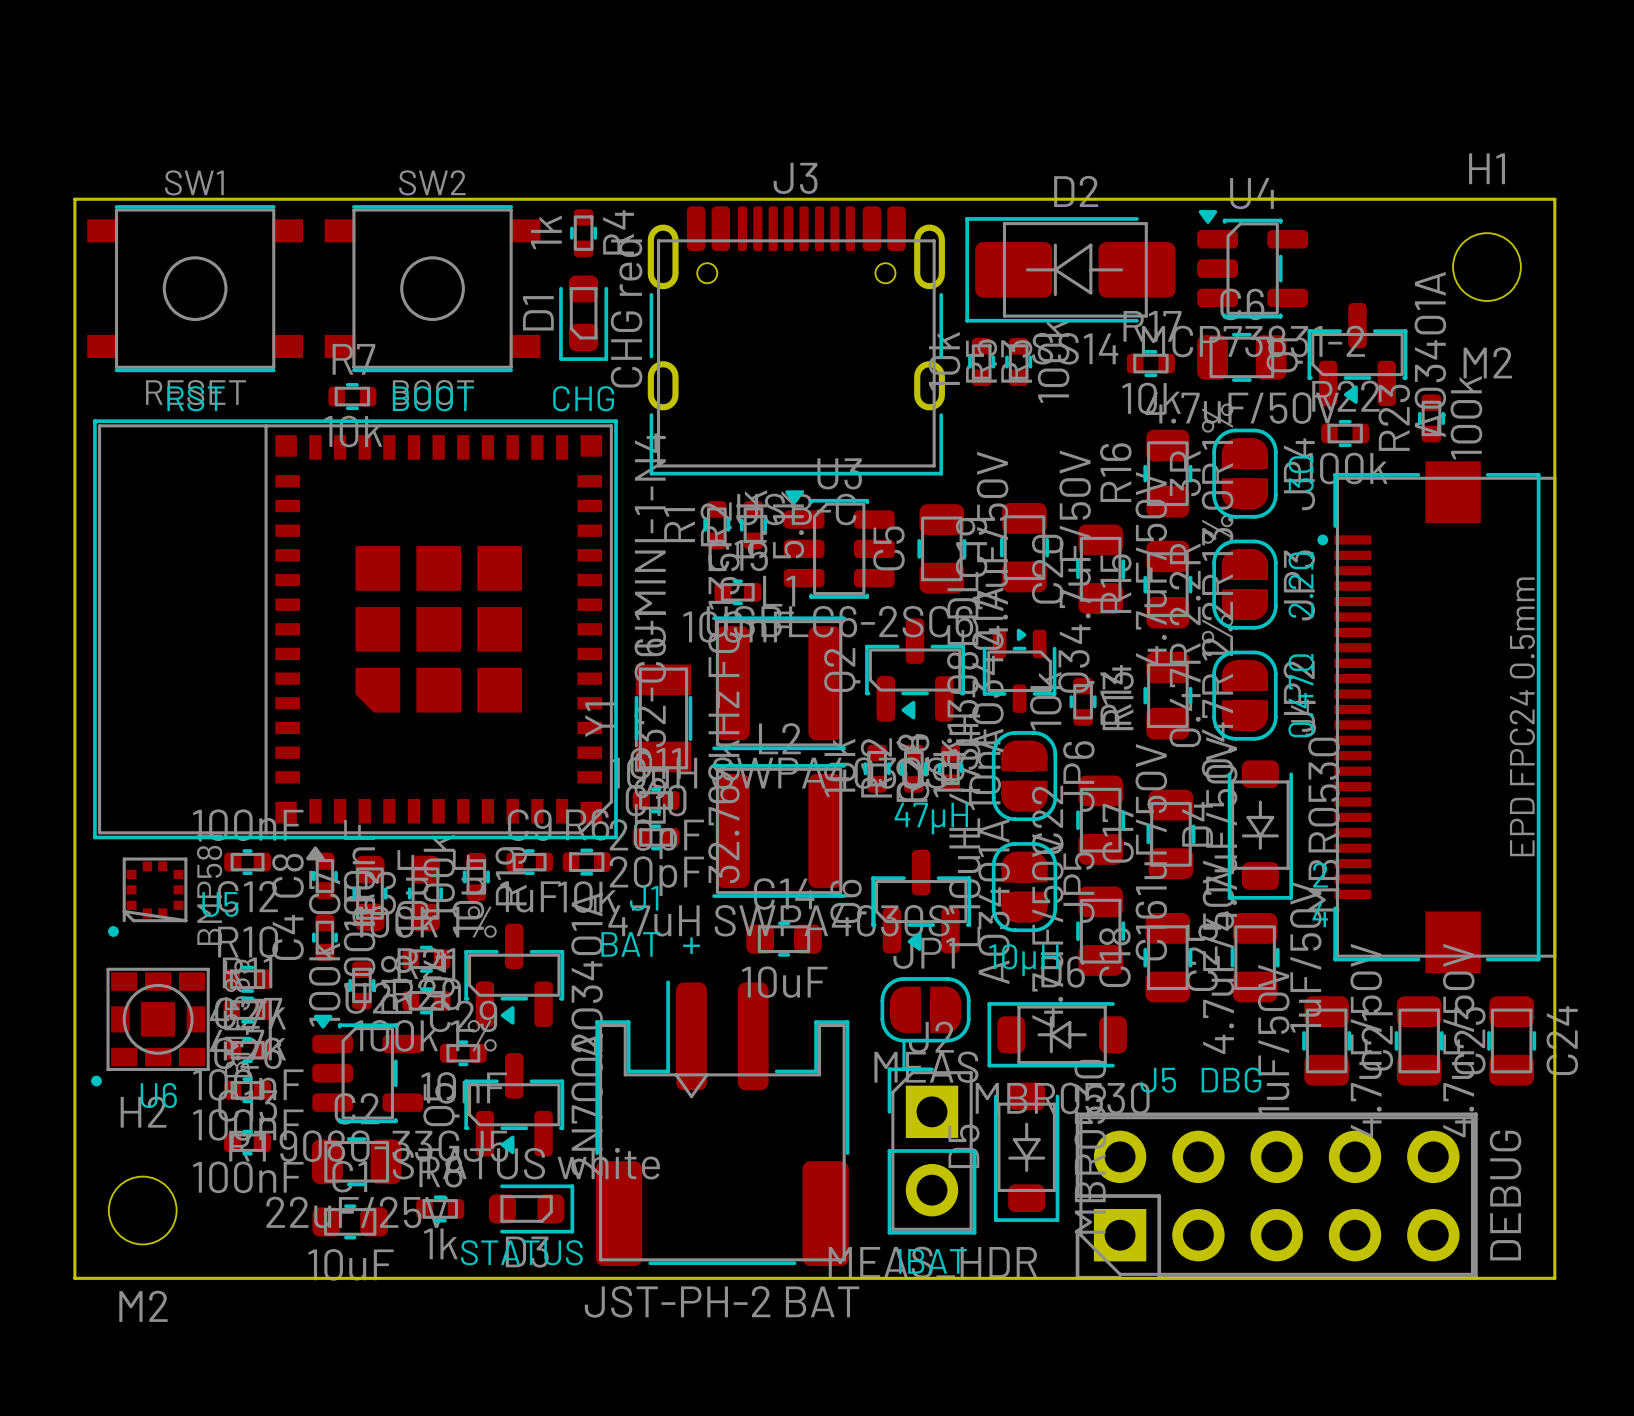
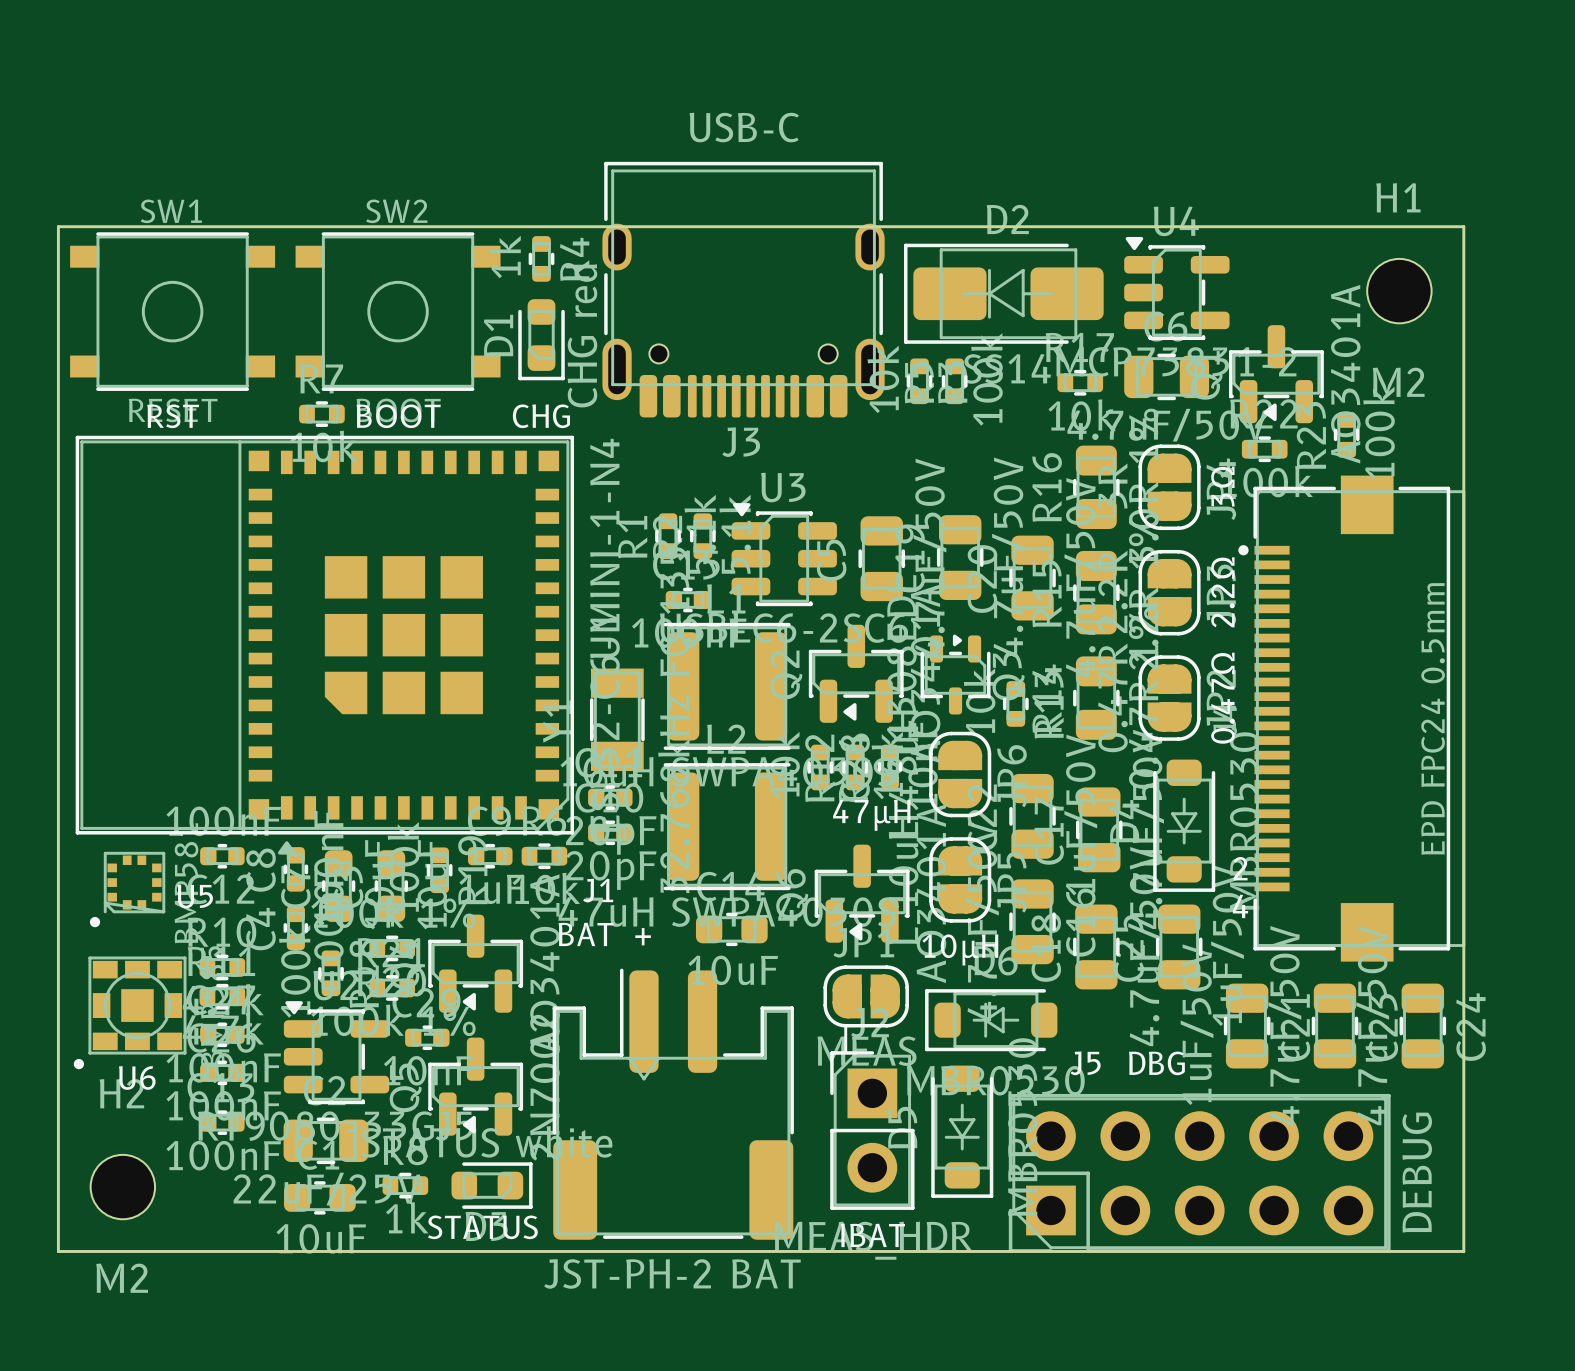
J3 rotation: 0° (796, 340) -> 180° (743, 289)

